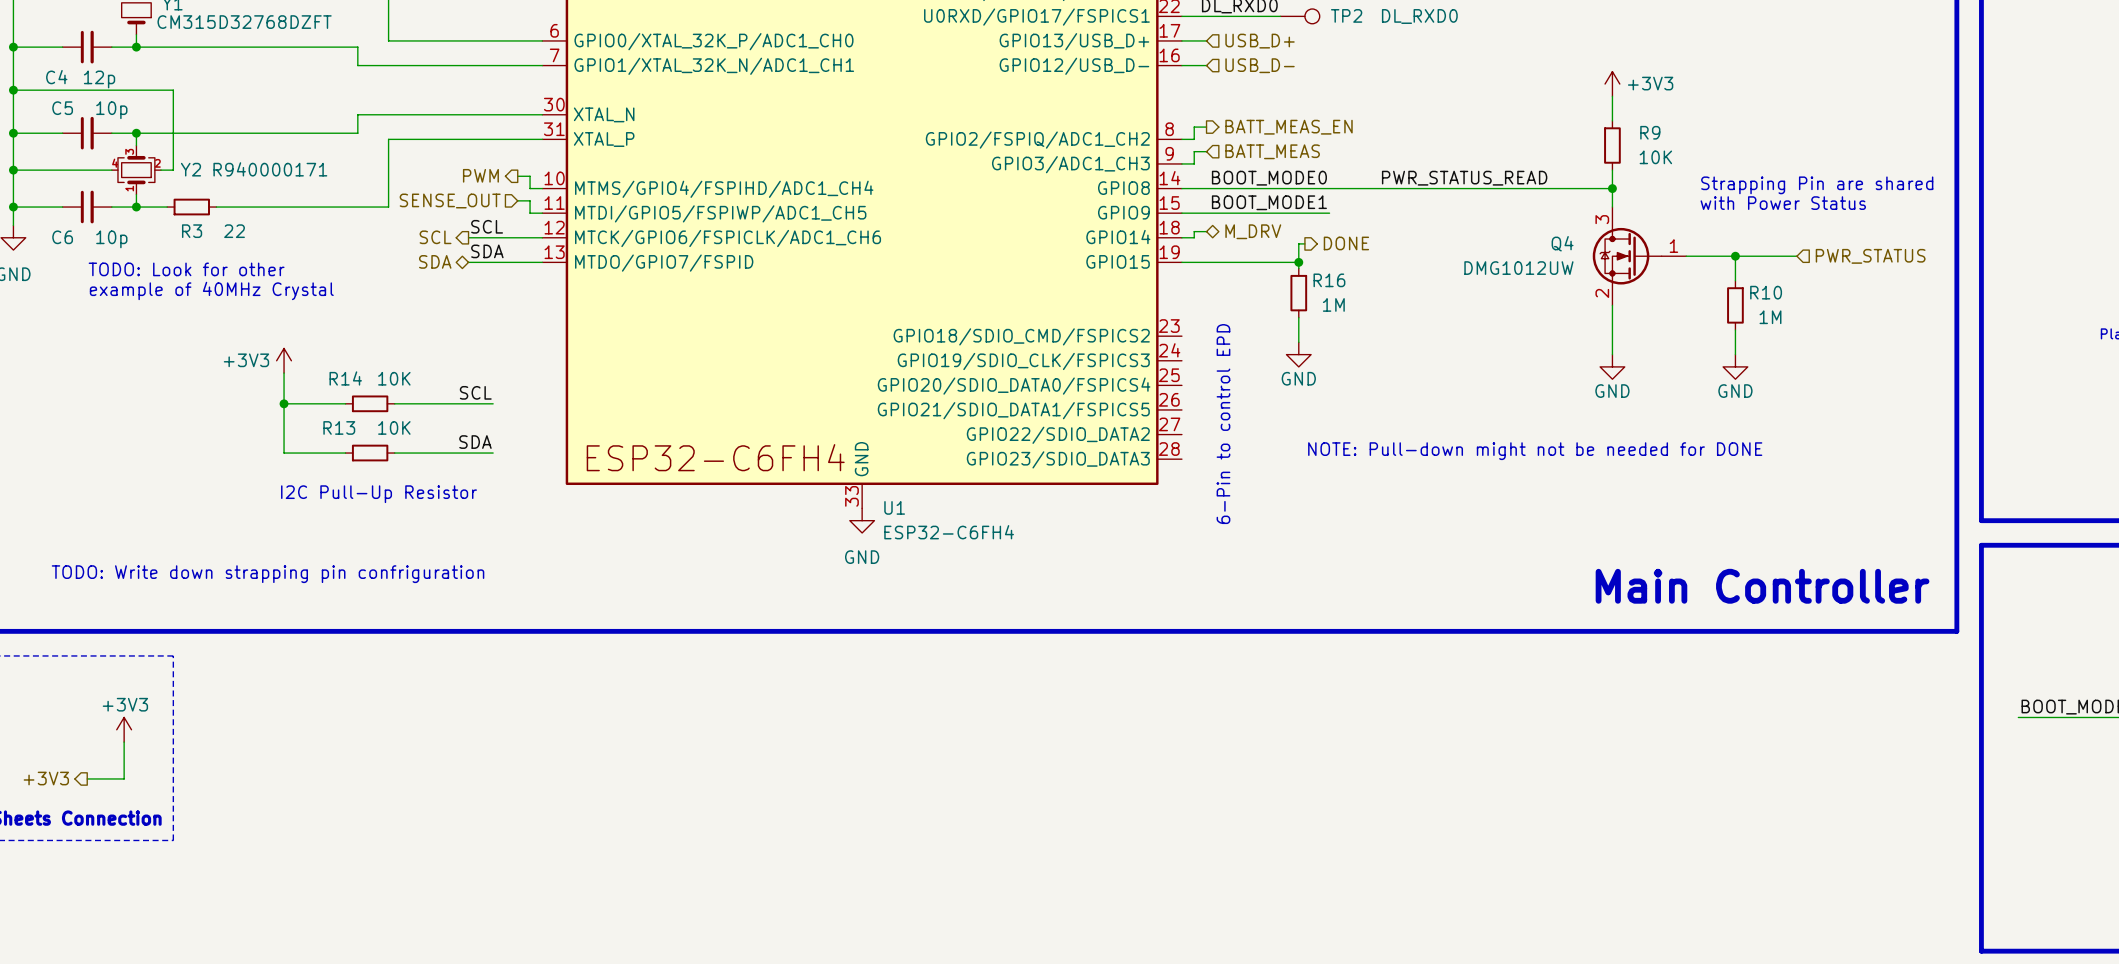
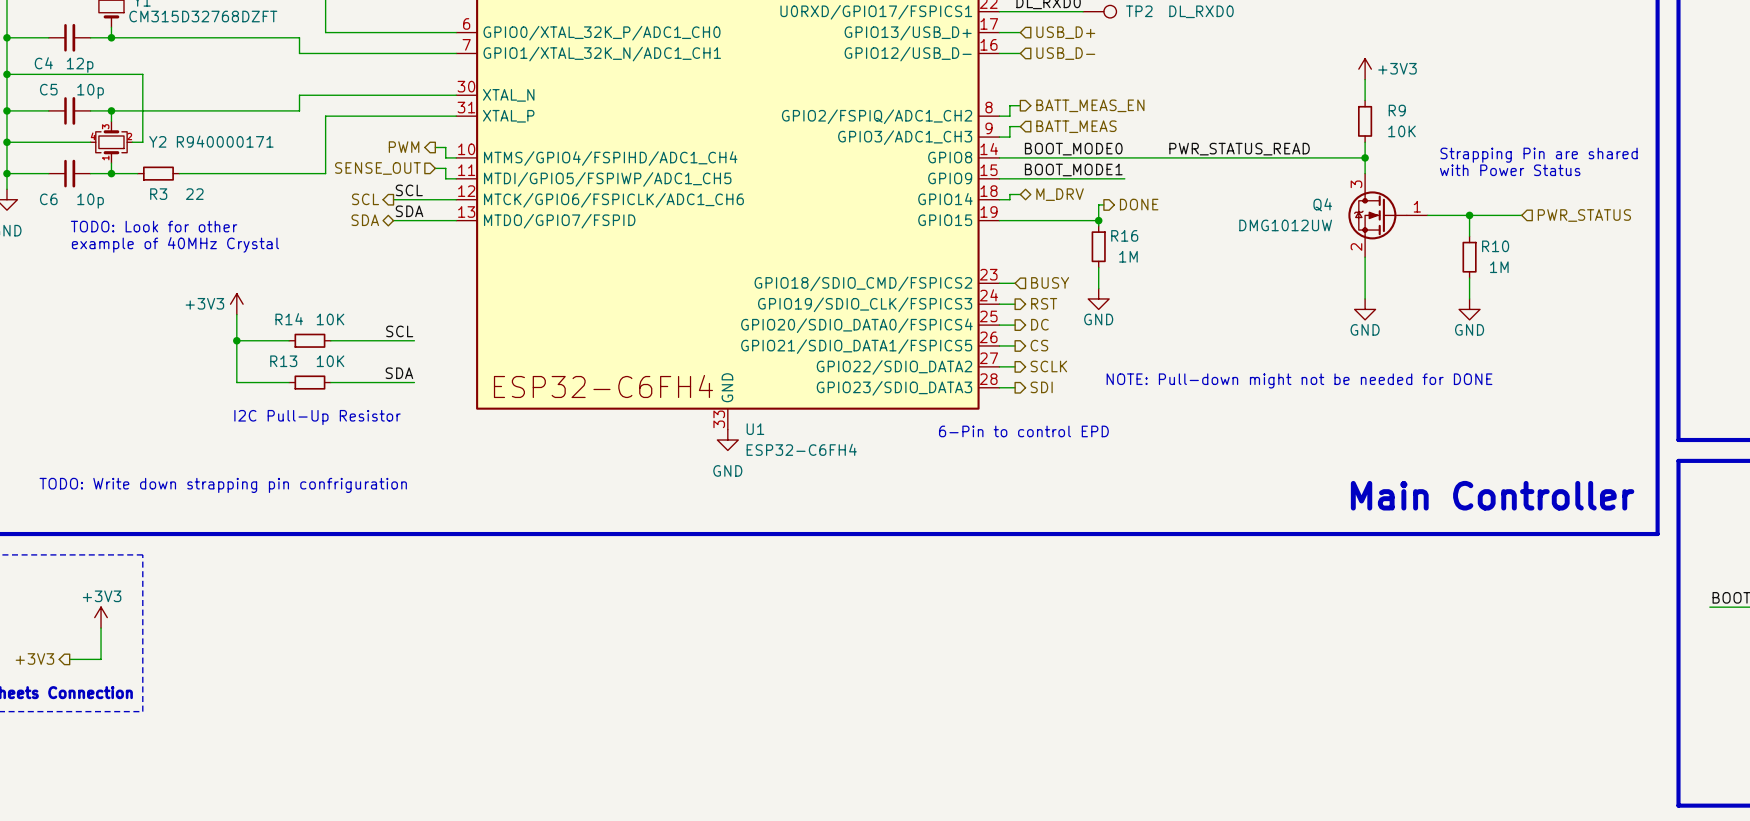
hierarchical label: none -> BUSY (1050, 282)
wire: none -> (999, 283) (1015, 283)
wire: none -> (999, 304) (1015, 304)
hierarchical label: none -> RST (1044, 303)
hierarchical label: none -> DC (1039, 324)
wire: none -> (999, 325) (1015, 325)
wire: none -> (999, 345) (1015, 345)
hierarchical label: none -> CS (1039, 345)
text rotation: 0° (1223, 424) -> 90° clockwise (1023, 431)
wire: none -> (999, 366) (1015, 366)
hierarchical label: none -> SCLK (1048, 366)
hierarchical label: none -> SDI (1041, 387)
wire: none -> (999, 387) (1015, 387)

